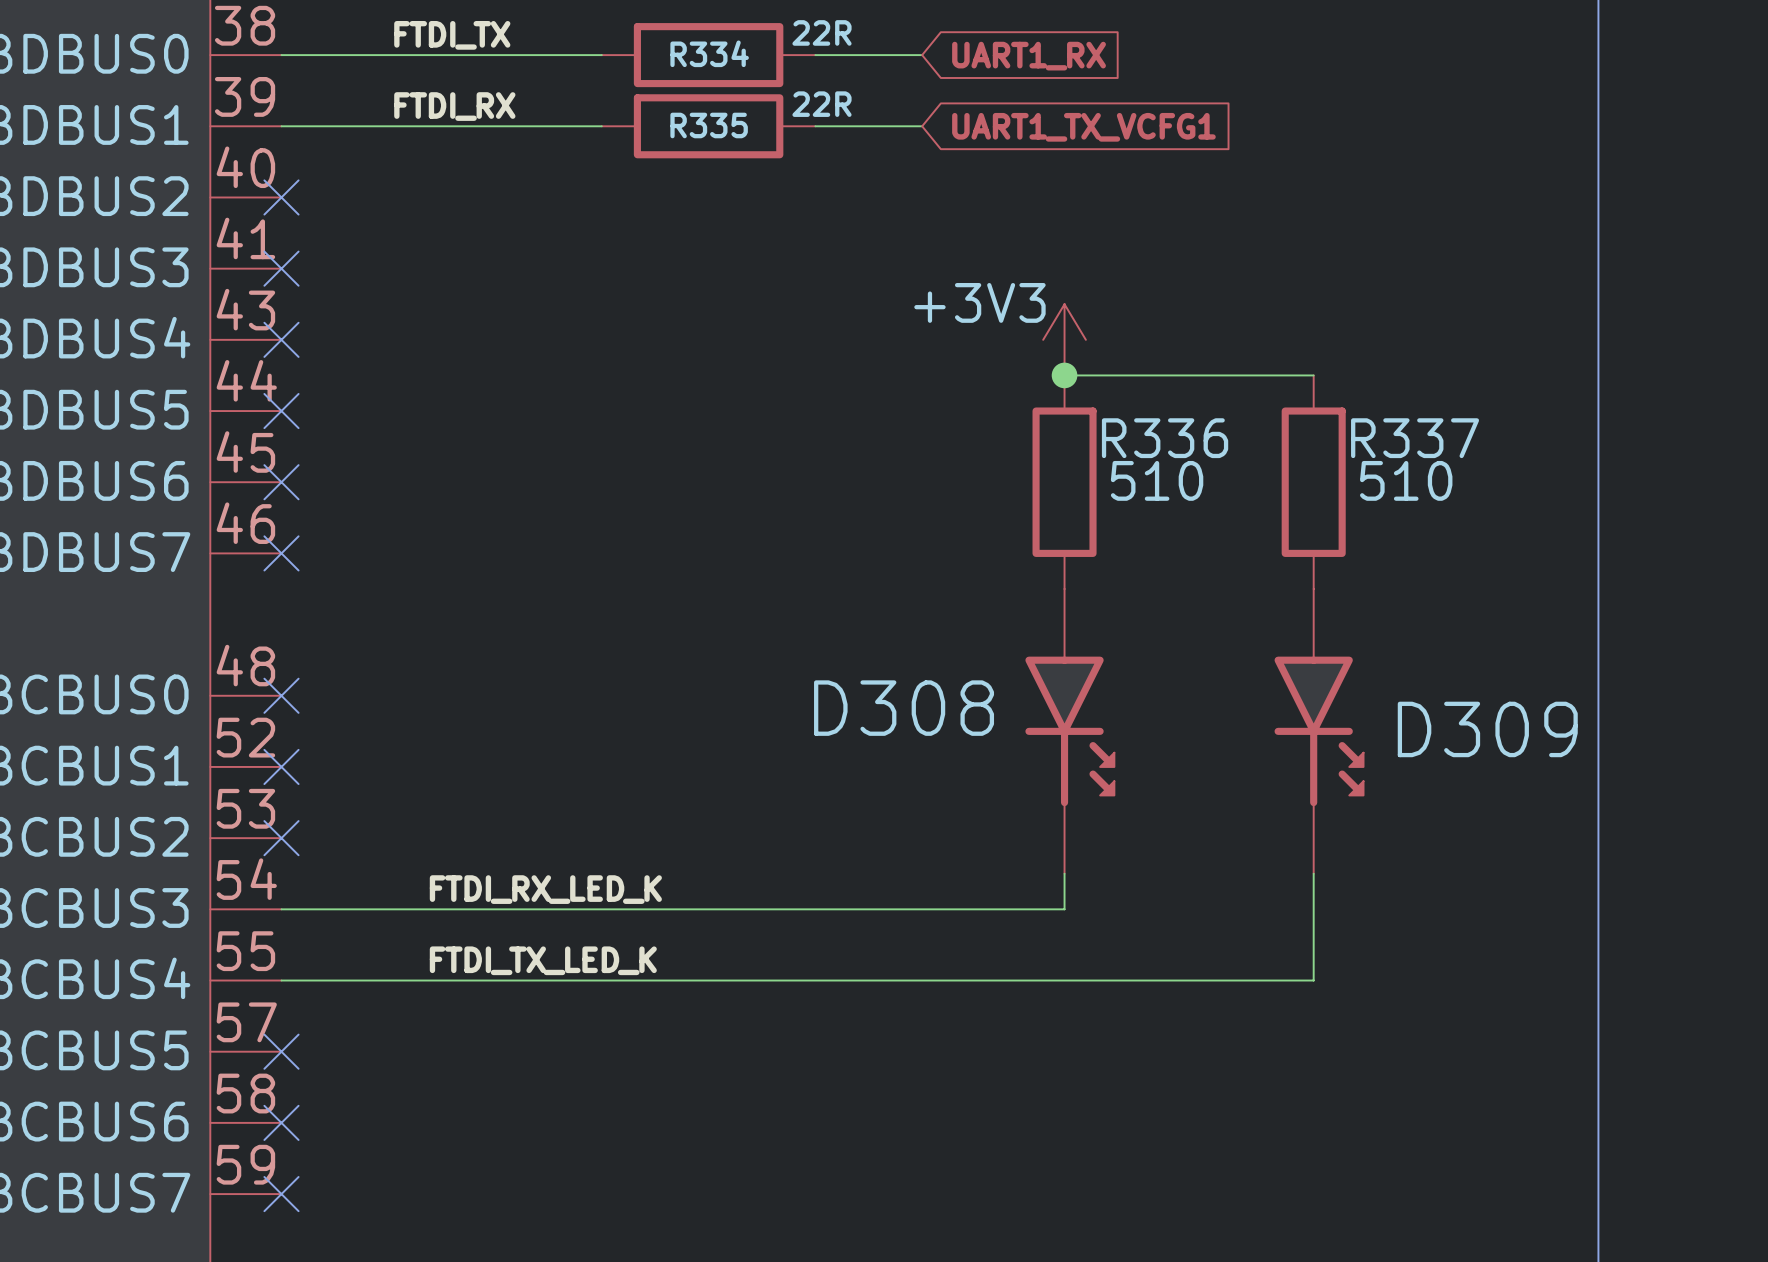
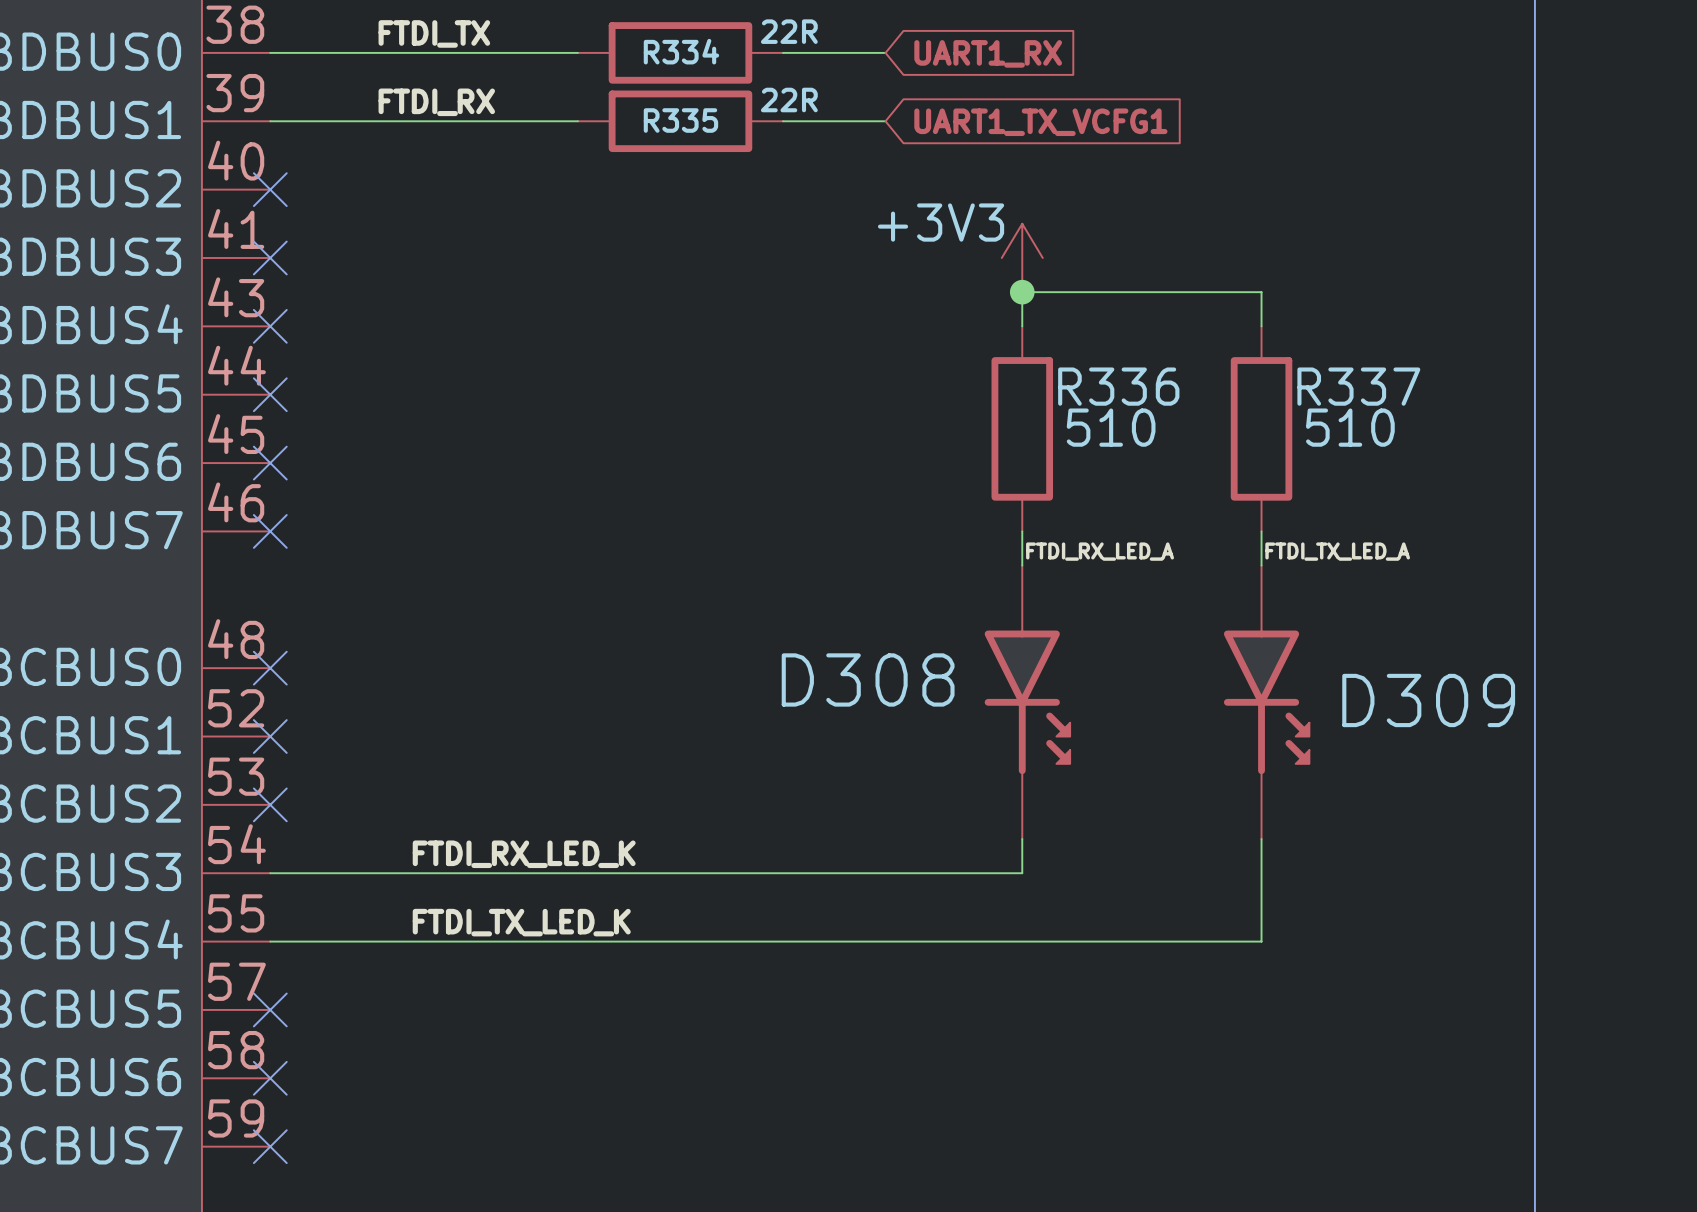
wire: none -> (1022, 326) (1022, 292) (1261, 292) (1261, 326)
power symbol position: +3V3 (1064, 339) -> +3V3 (1022, 257)
wire: (1064, 375) (1313, 375) -> none
junction position: (1064, 375) -> (1022, 292)
R336 position: (1064, 482) -> (1022, 428)
R337 position: (1313, 482) -> (1261, 428)
label: none -> FTDI_RX_LED_A (1100, 551)
label: none -> FTDI_TX_LED_A (1337, 551)

